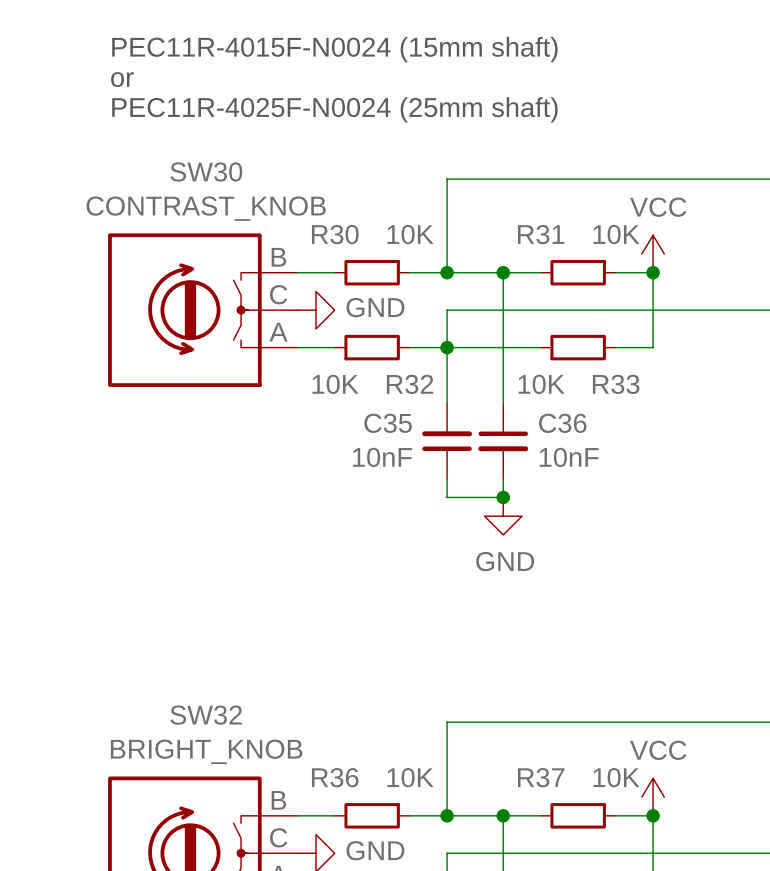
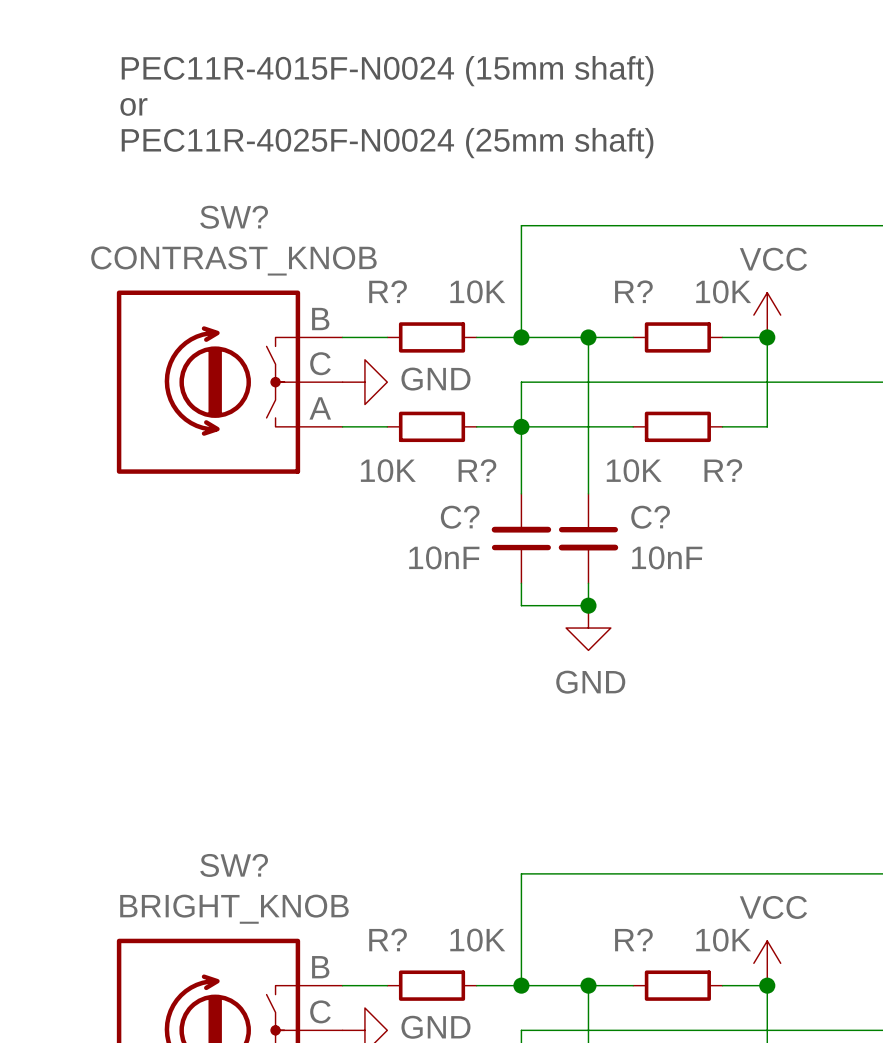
SW30 name: SW30 (206, 171) -> SW? (234, 217)
R30 name: R30 (335, 234) -> R? (388, 291)
R31 name: R31 (541, 234) -> R? (633, 291)
R32 name: R32 (410, 384) -> R? (477, 470)
R33 name: R33 (616, 384) -> R? (723, 470)
C35 name: C35 (388, 423) -> C? (460, 517)
C36 name: C36 (562, 423) -> C? (650, 517)
SW32 name: SW32 (206, 715) -> SW? (234, 865)
R36 name: R36 (335, 777) -> R? (388, 939)
R37 name: R37 (541, 777) -> R? (633, 939)

